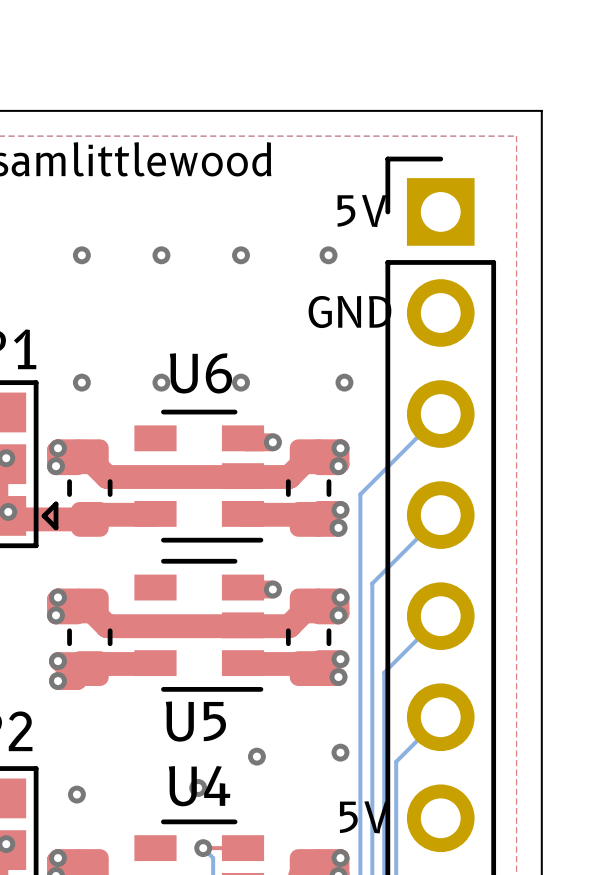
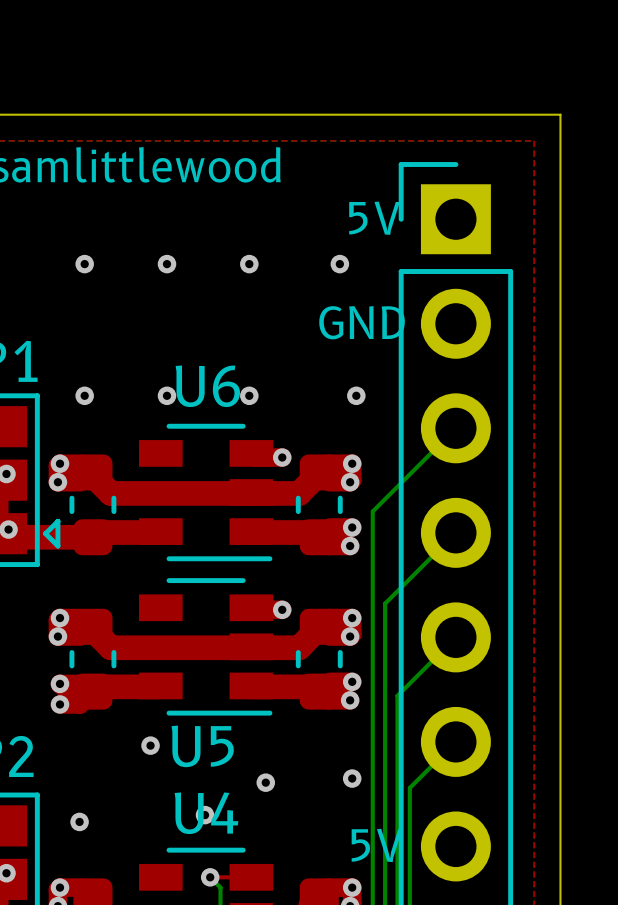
via: none -> (150, 745)

